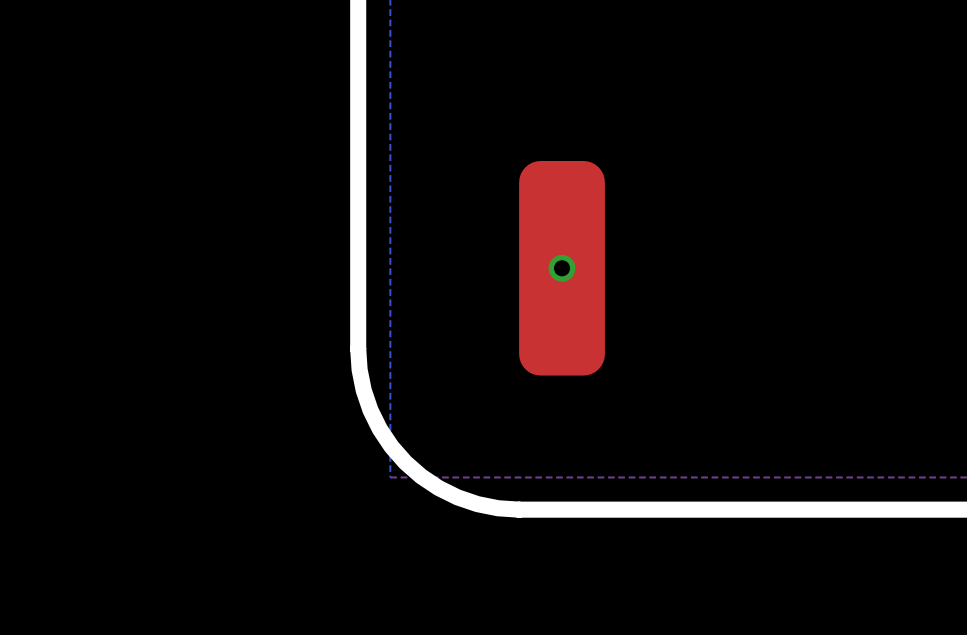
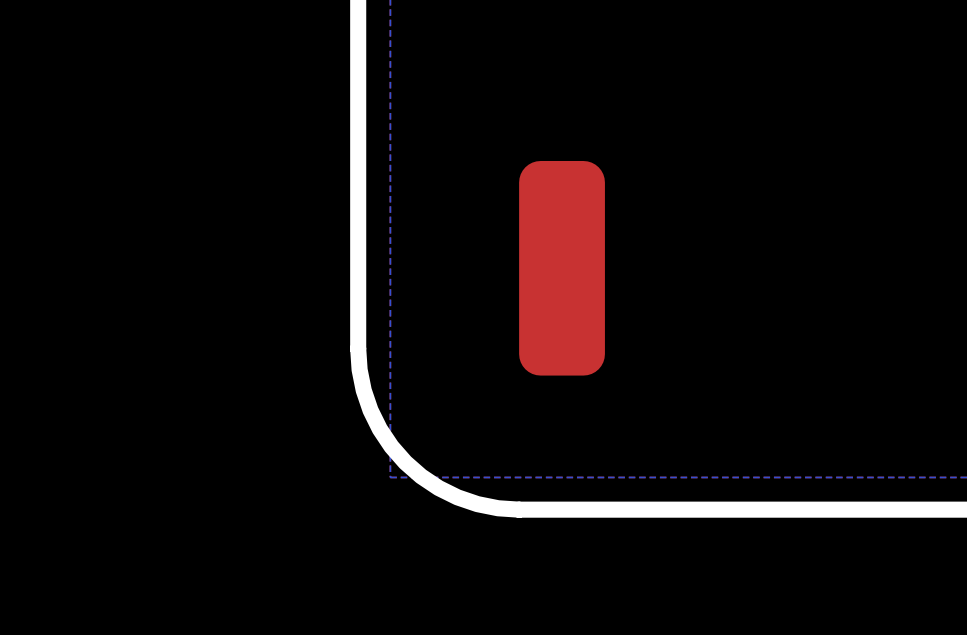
via: (562, 268) -> none

